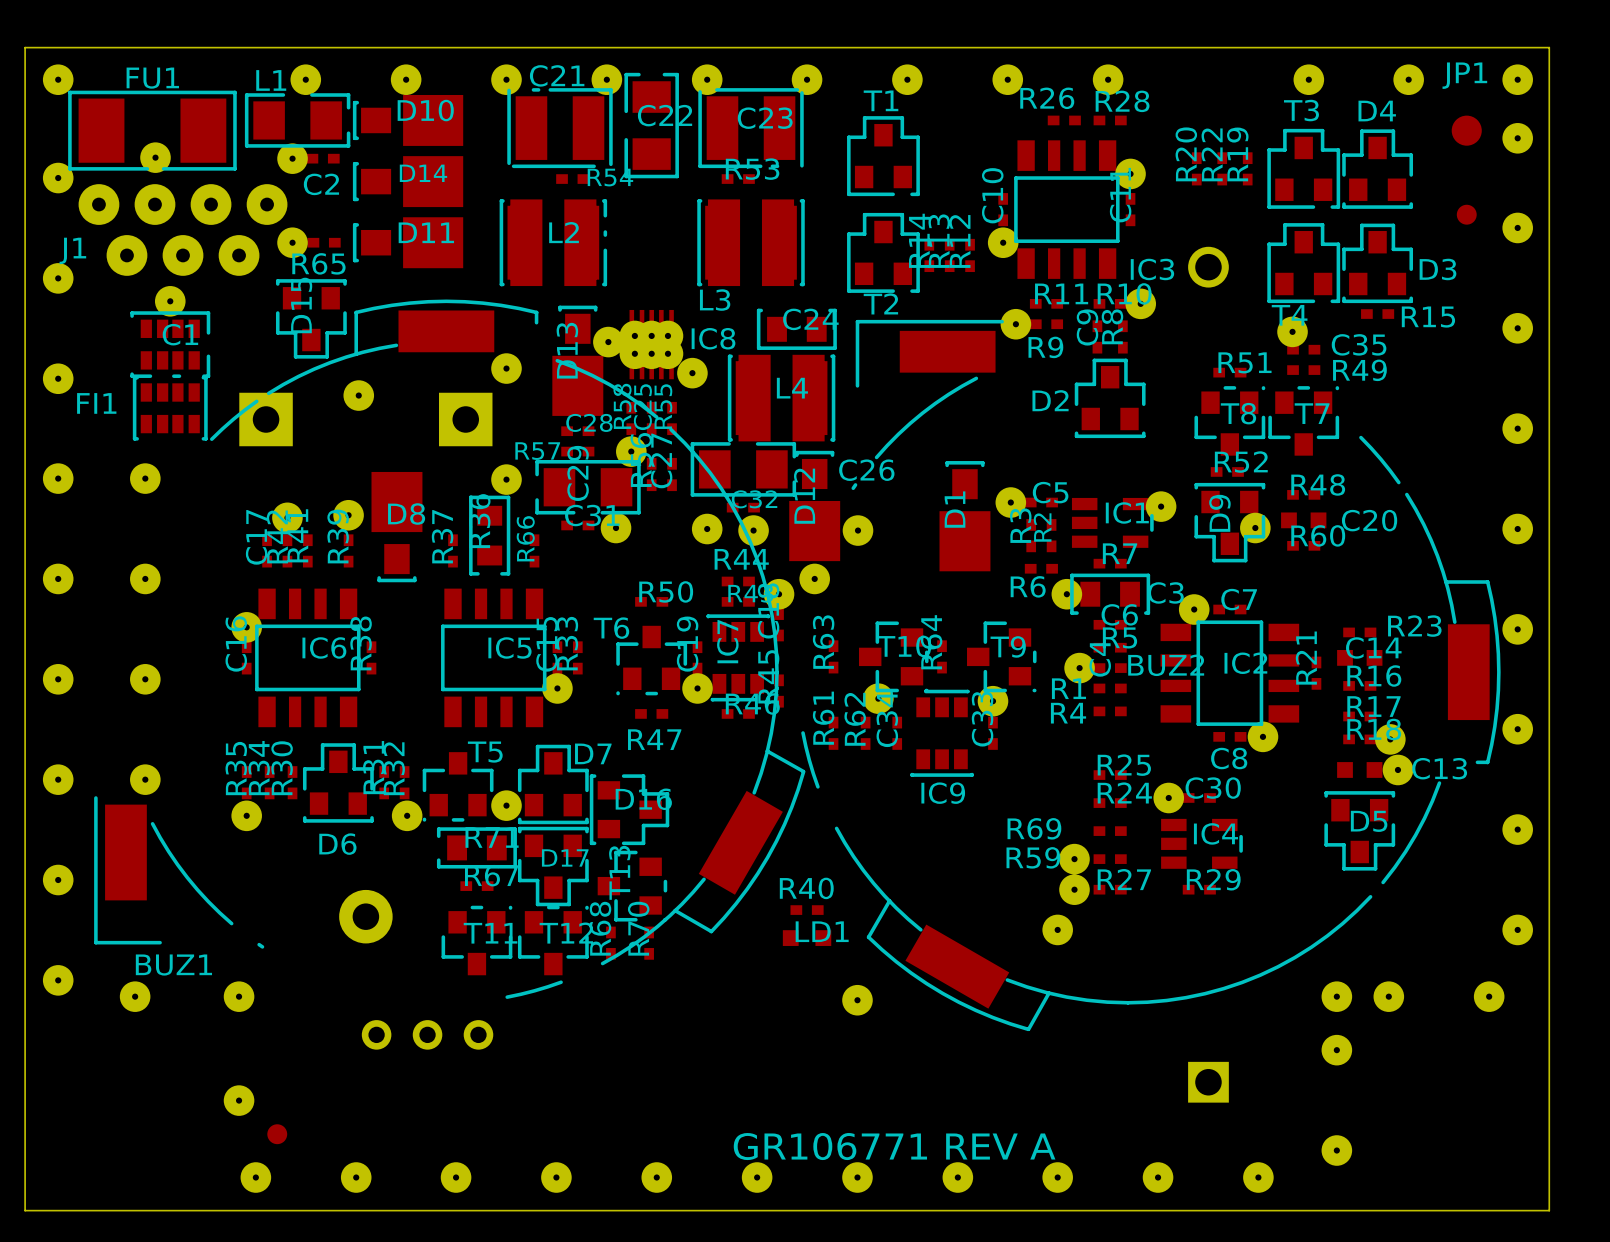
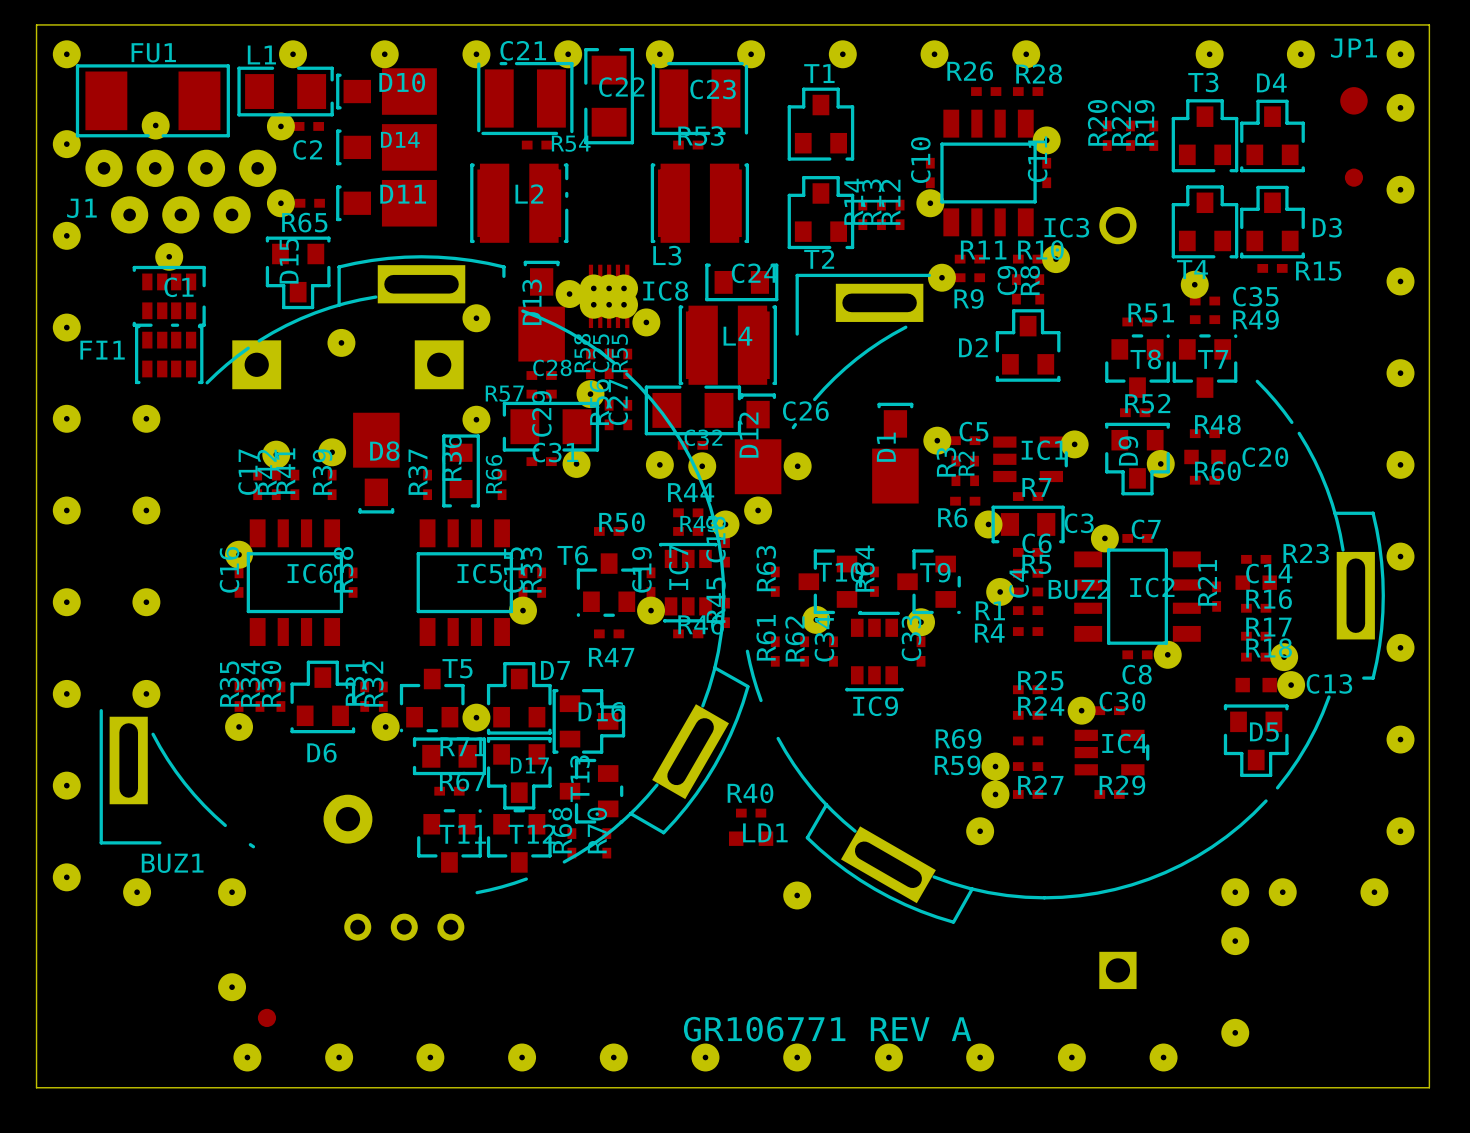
BUZ1 footprint: [94, 299, 806, 999] -> [99, 255, 750, 895]
BUZ2 footprint: [801, 319, 1501, 1032] -> [745, 273, 1385, 924]

